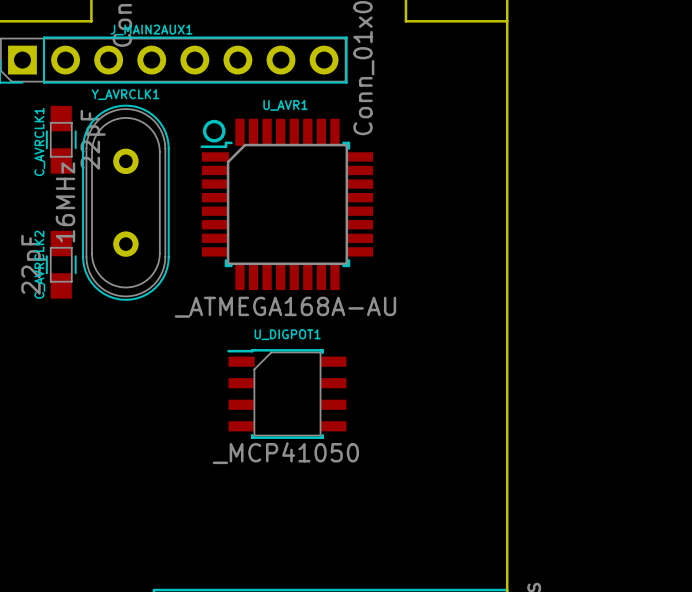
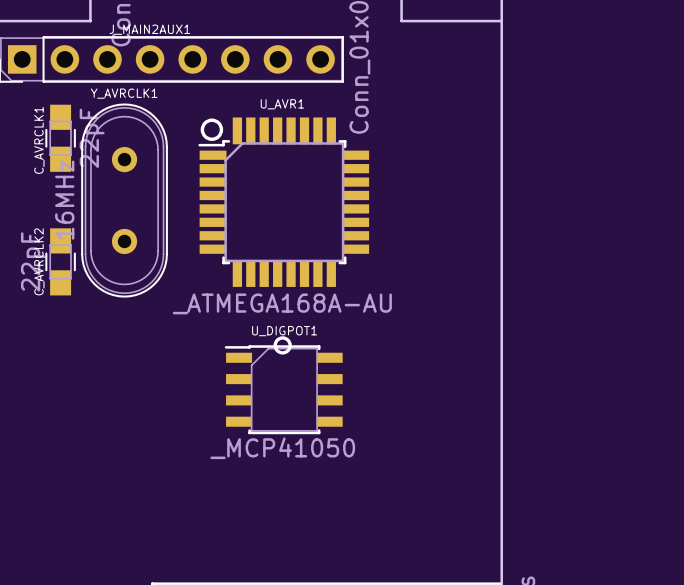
drawing: none -> [273, 336, 292, 355]

